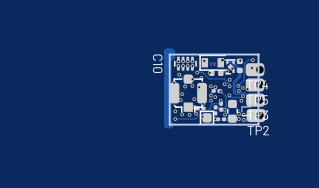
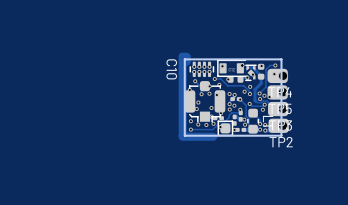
track: none -> (213, 136) (182, 136)

